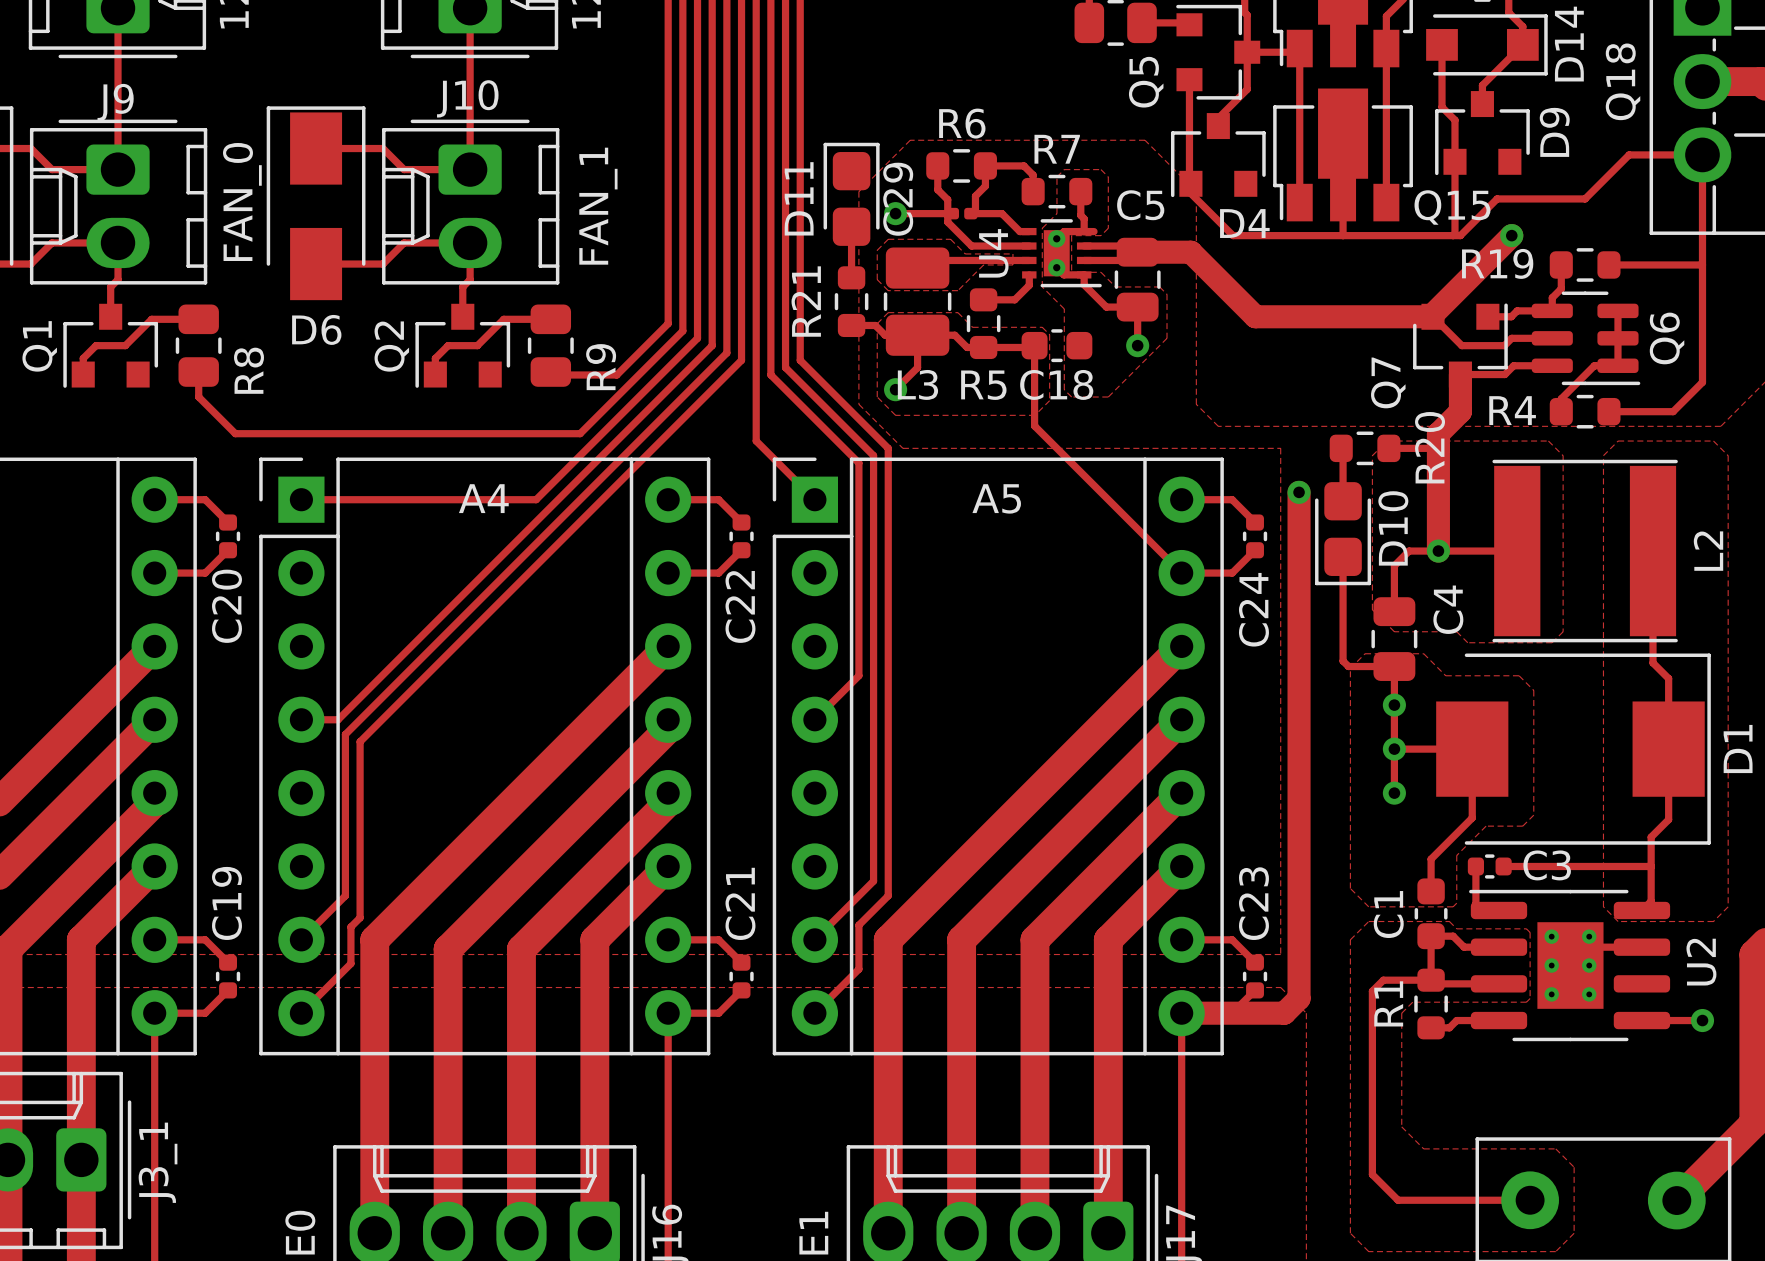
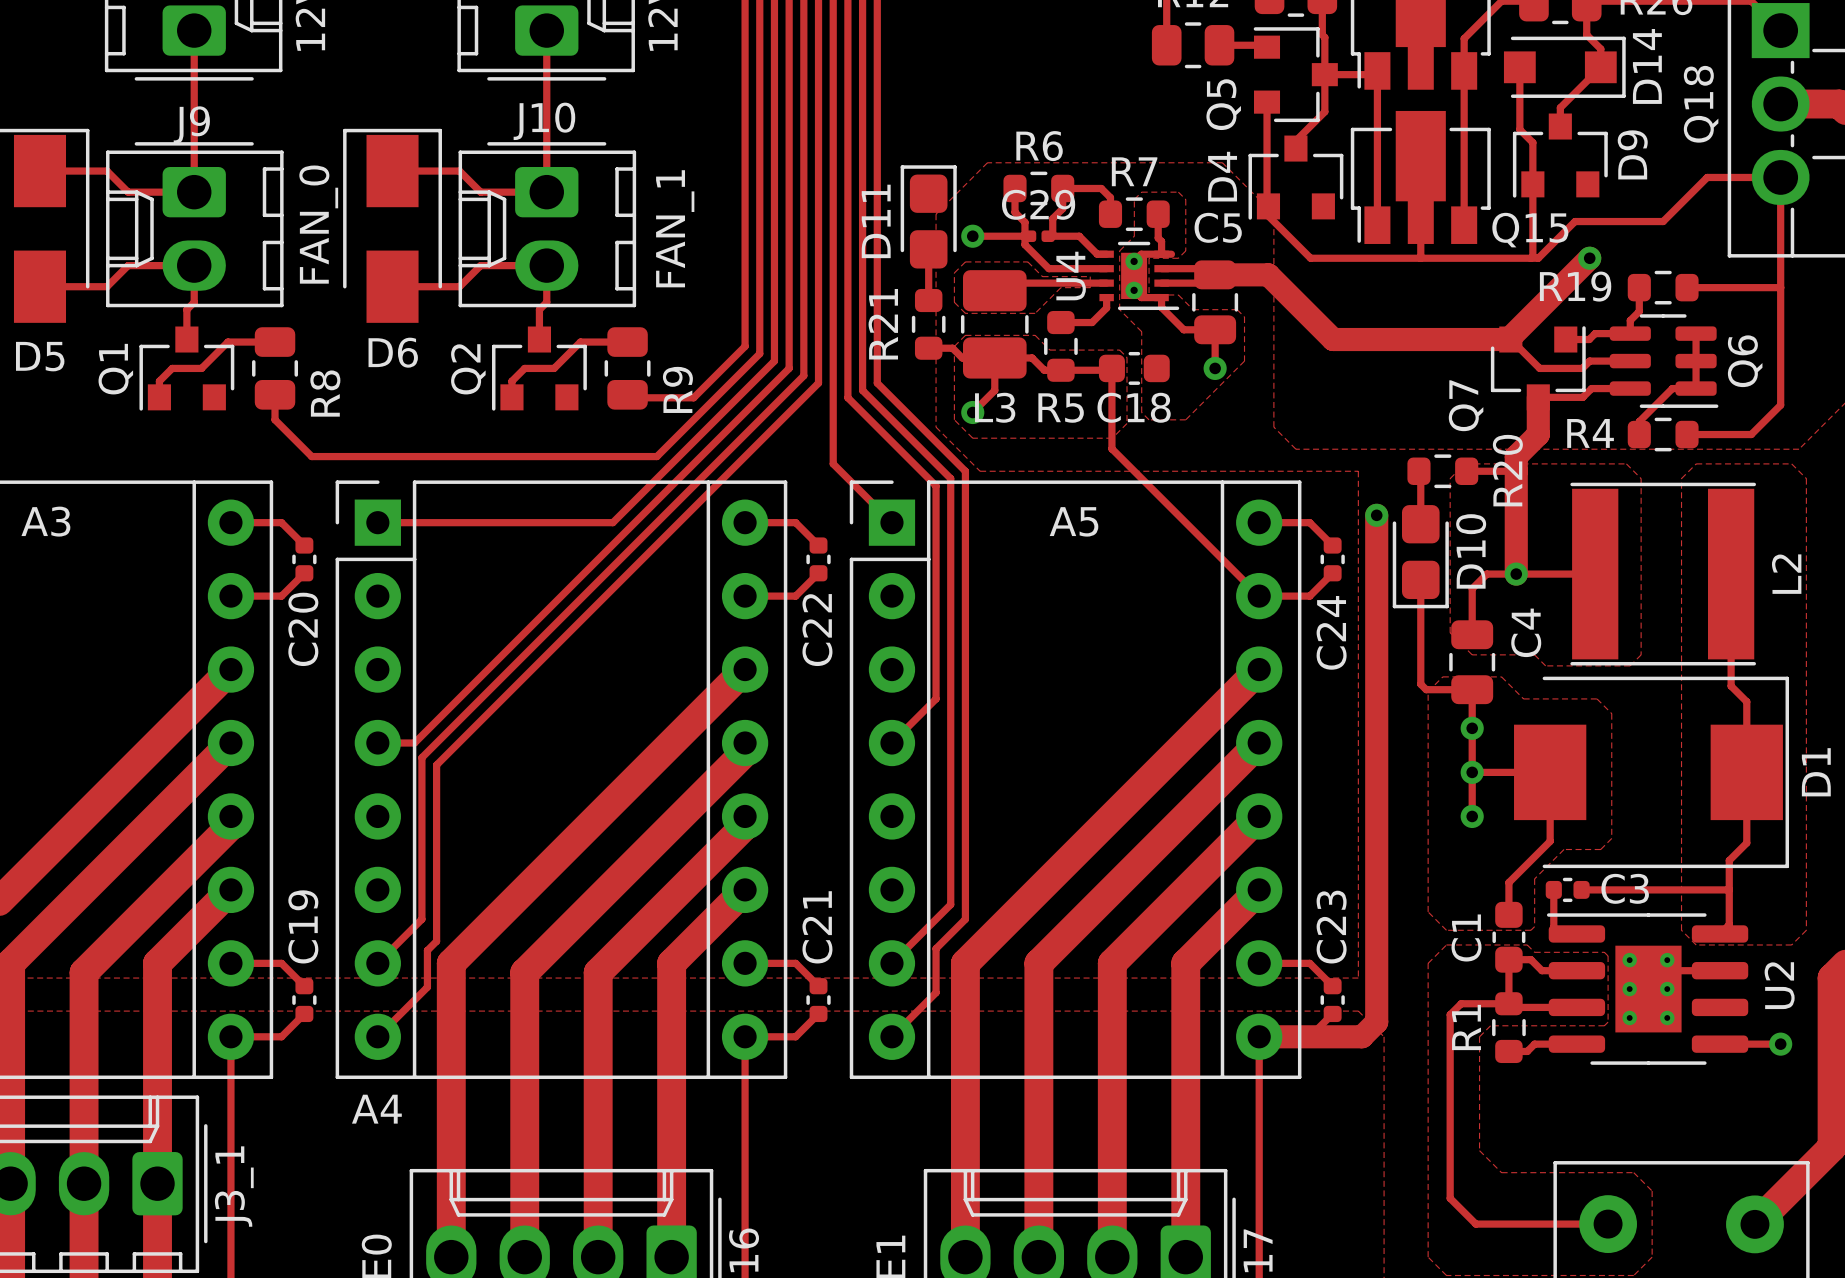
C29 name rotation: 0° (898, 199) -> 90° clockwise (1038, 204)
D4 name rotation: 0° (1244, 223) -> 90° counterclockwise (1222, 176)
D4 name position: D4 (1244, 223) -> D4 (1222, 176)
A4 name position: A4 (483, 498) -> A4 (376, 1109)

